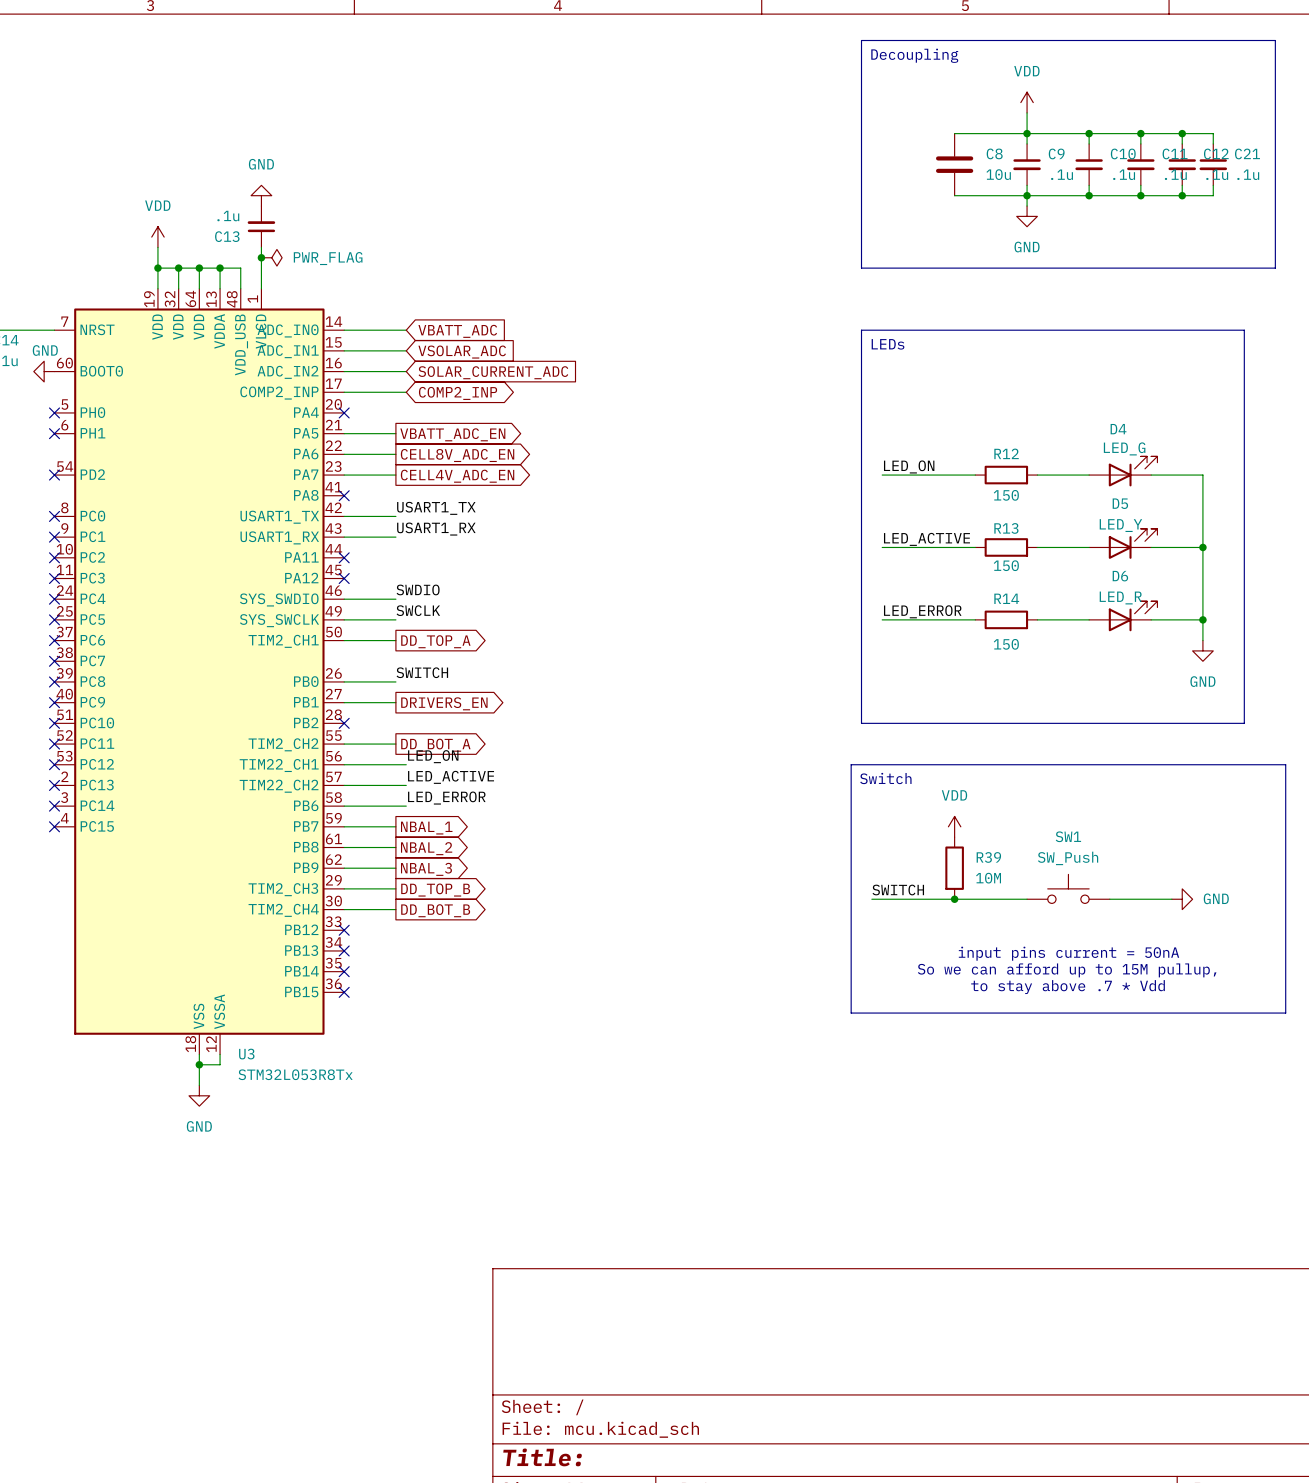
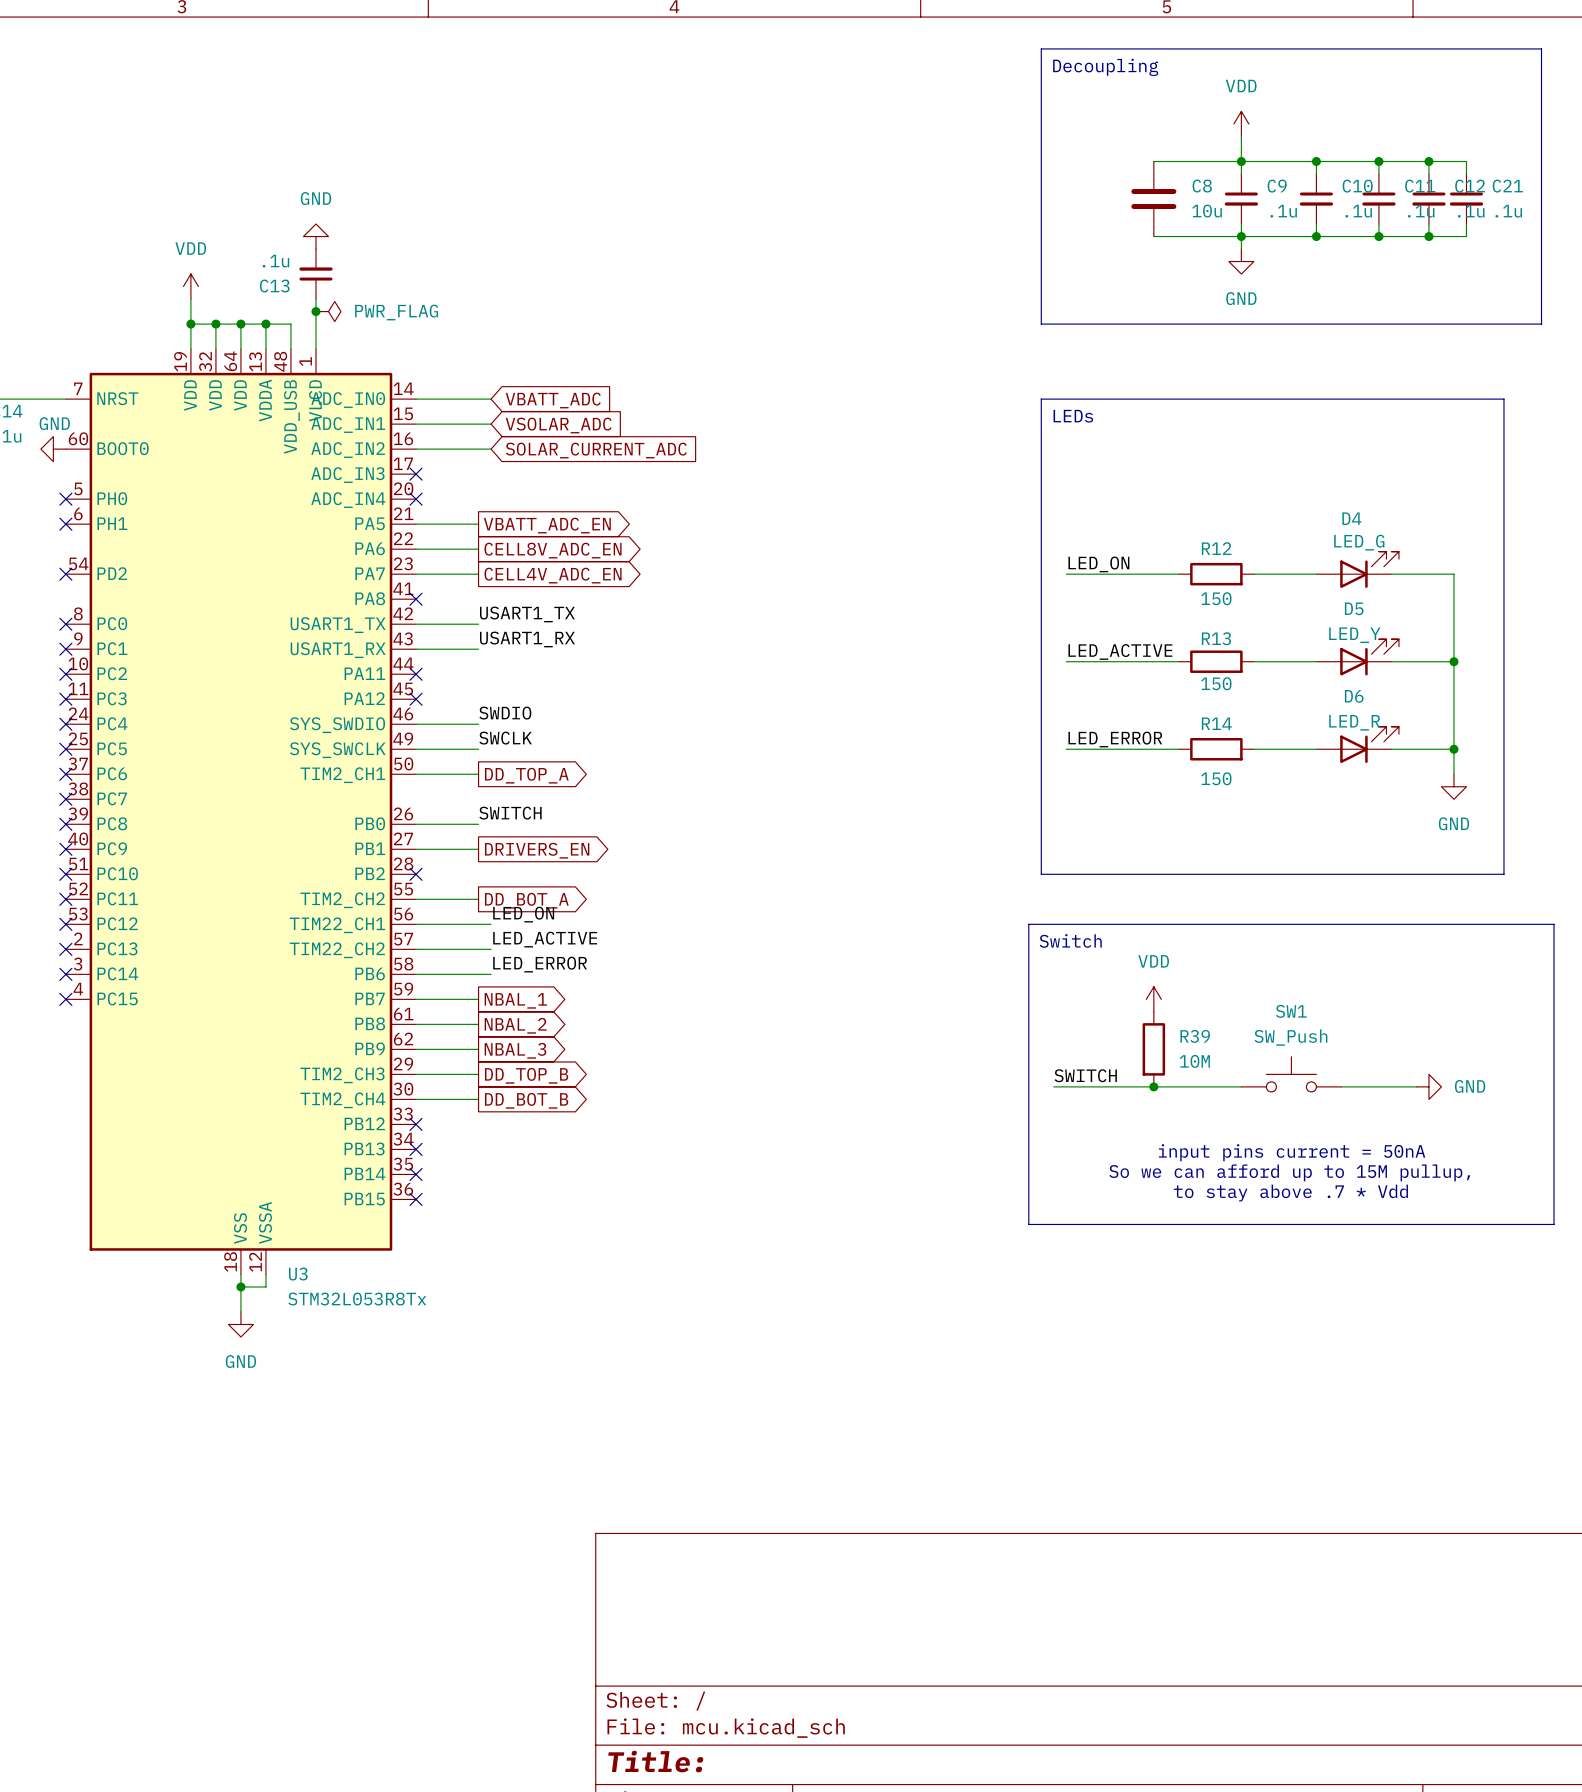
wire: (344, 392) (406, 392) -> none
no-connect mark: none -> (416, 474)
U3 pin name: COMP2_INP (279, 393) -> ADC_IN3 (347, 475)
global label: COMP2_INP (458, 393) -> none
U3 pin name: PA4 (306, 412) -> ADC_IN4 (348, 500)

